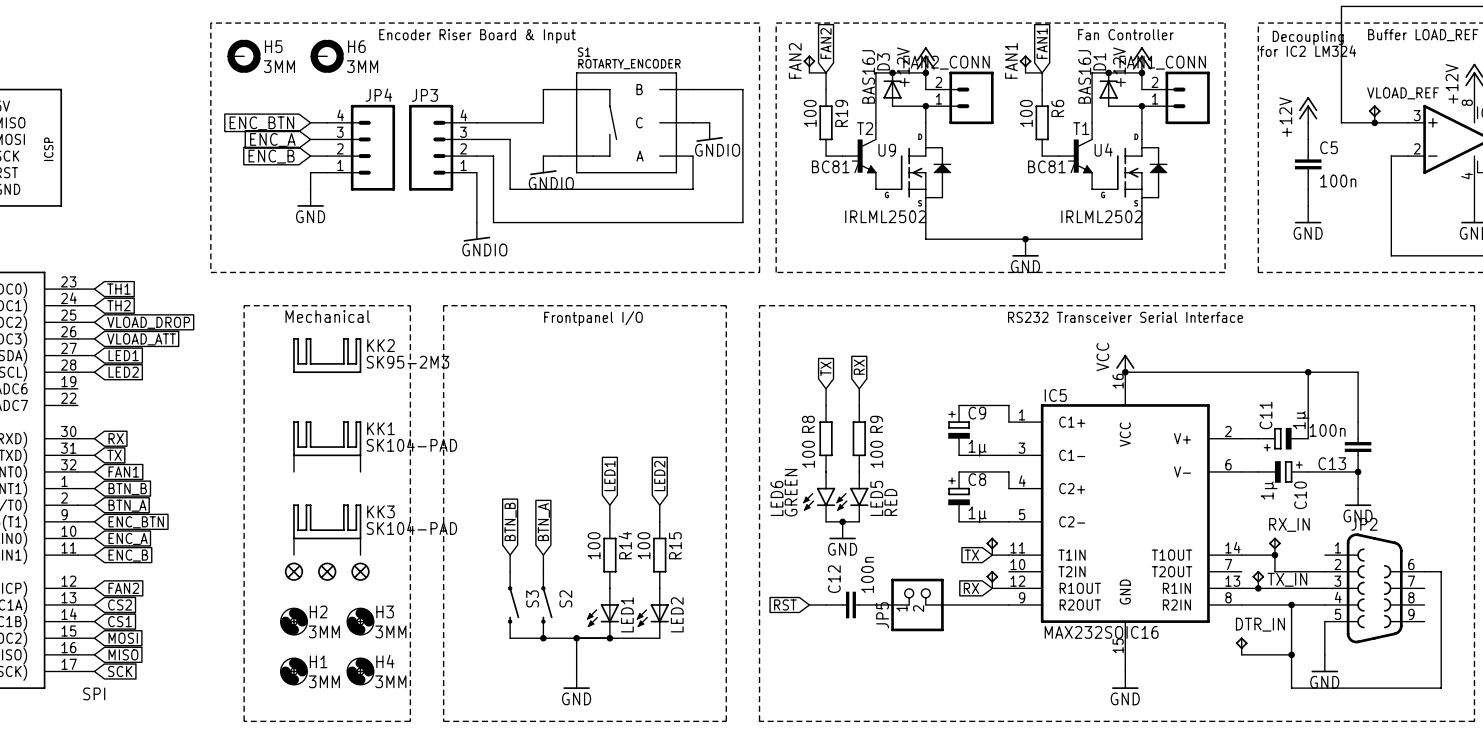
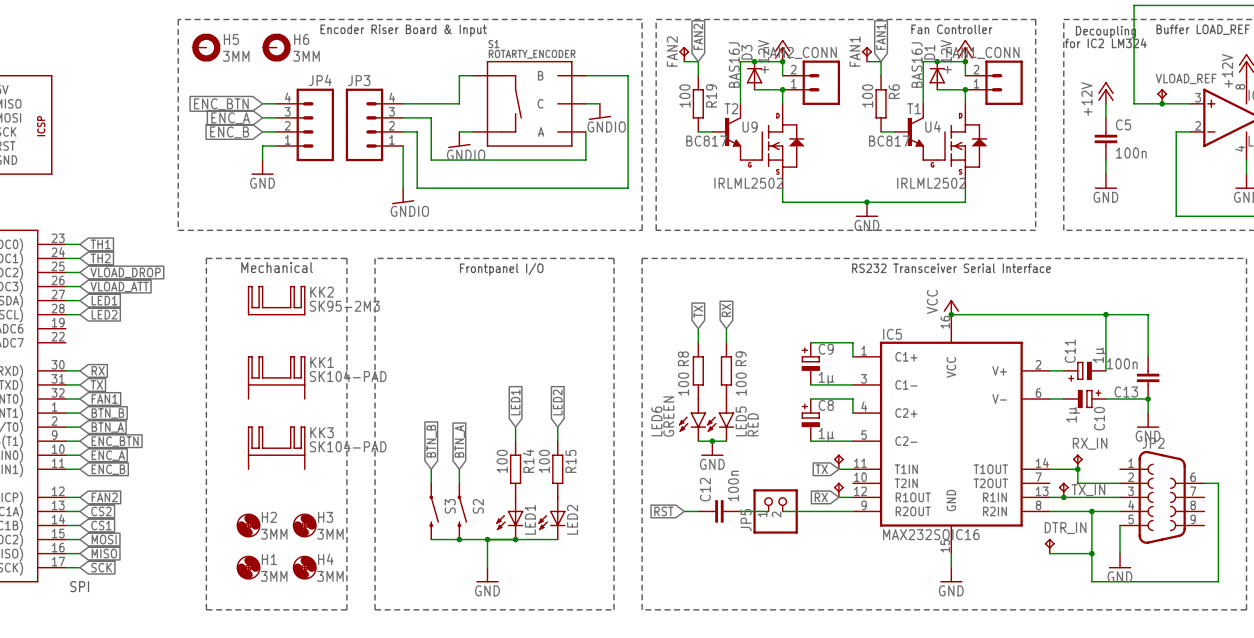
part: (293, 571) -> none
part: (327, 571) -> none
part: (360, 571) -> none

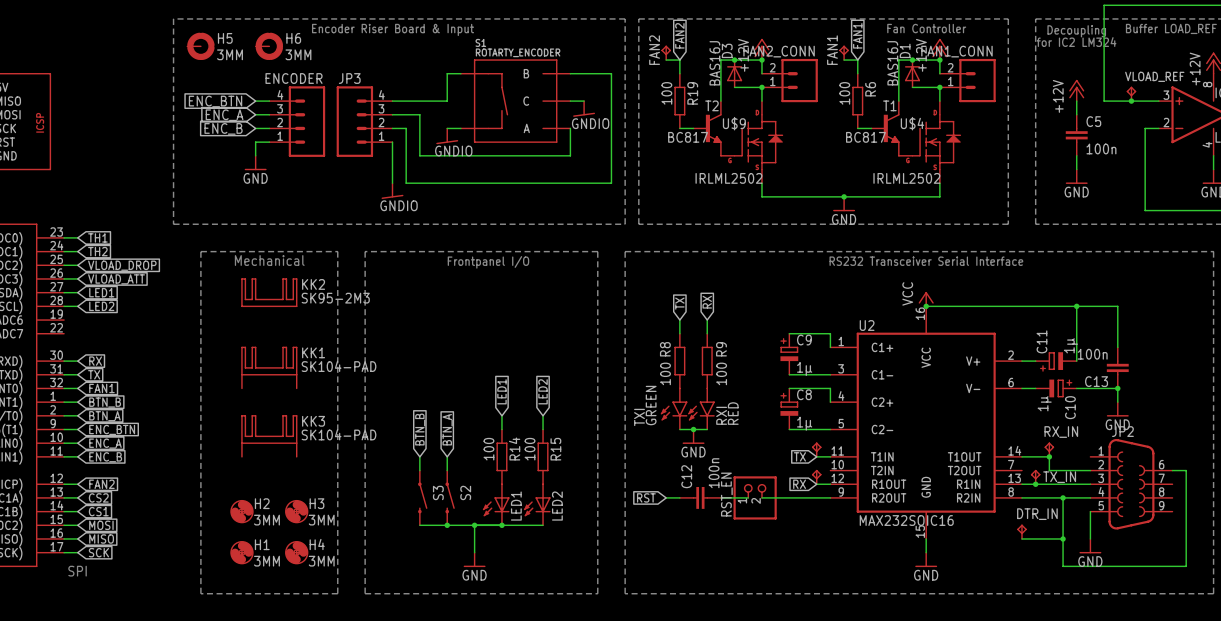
JP4 name: JP4 (320, 80) -> ENCODER (294, 78)
U4 name: U4 (933, 126) -> U$4 (912, 123)
U9 name: U9 (750, 127) -> U$9 (734, 123)
IC5 name: IC5 (892, 334) -> U2 (867, 325)
LED6 name: LED6 (656, 421) -> TXI (639, 417)
LED5 name: LED5 (741, 421) -> RXI (721, 415)
JP5 name: JP5 (746, 520) -> RST_EN (726, 494)

